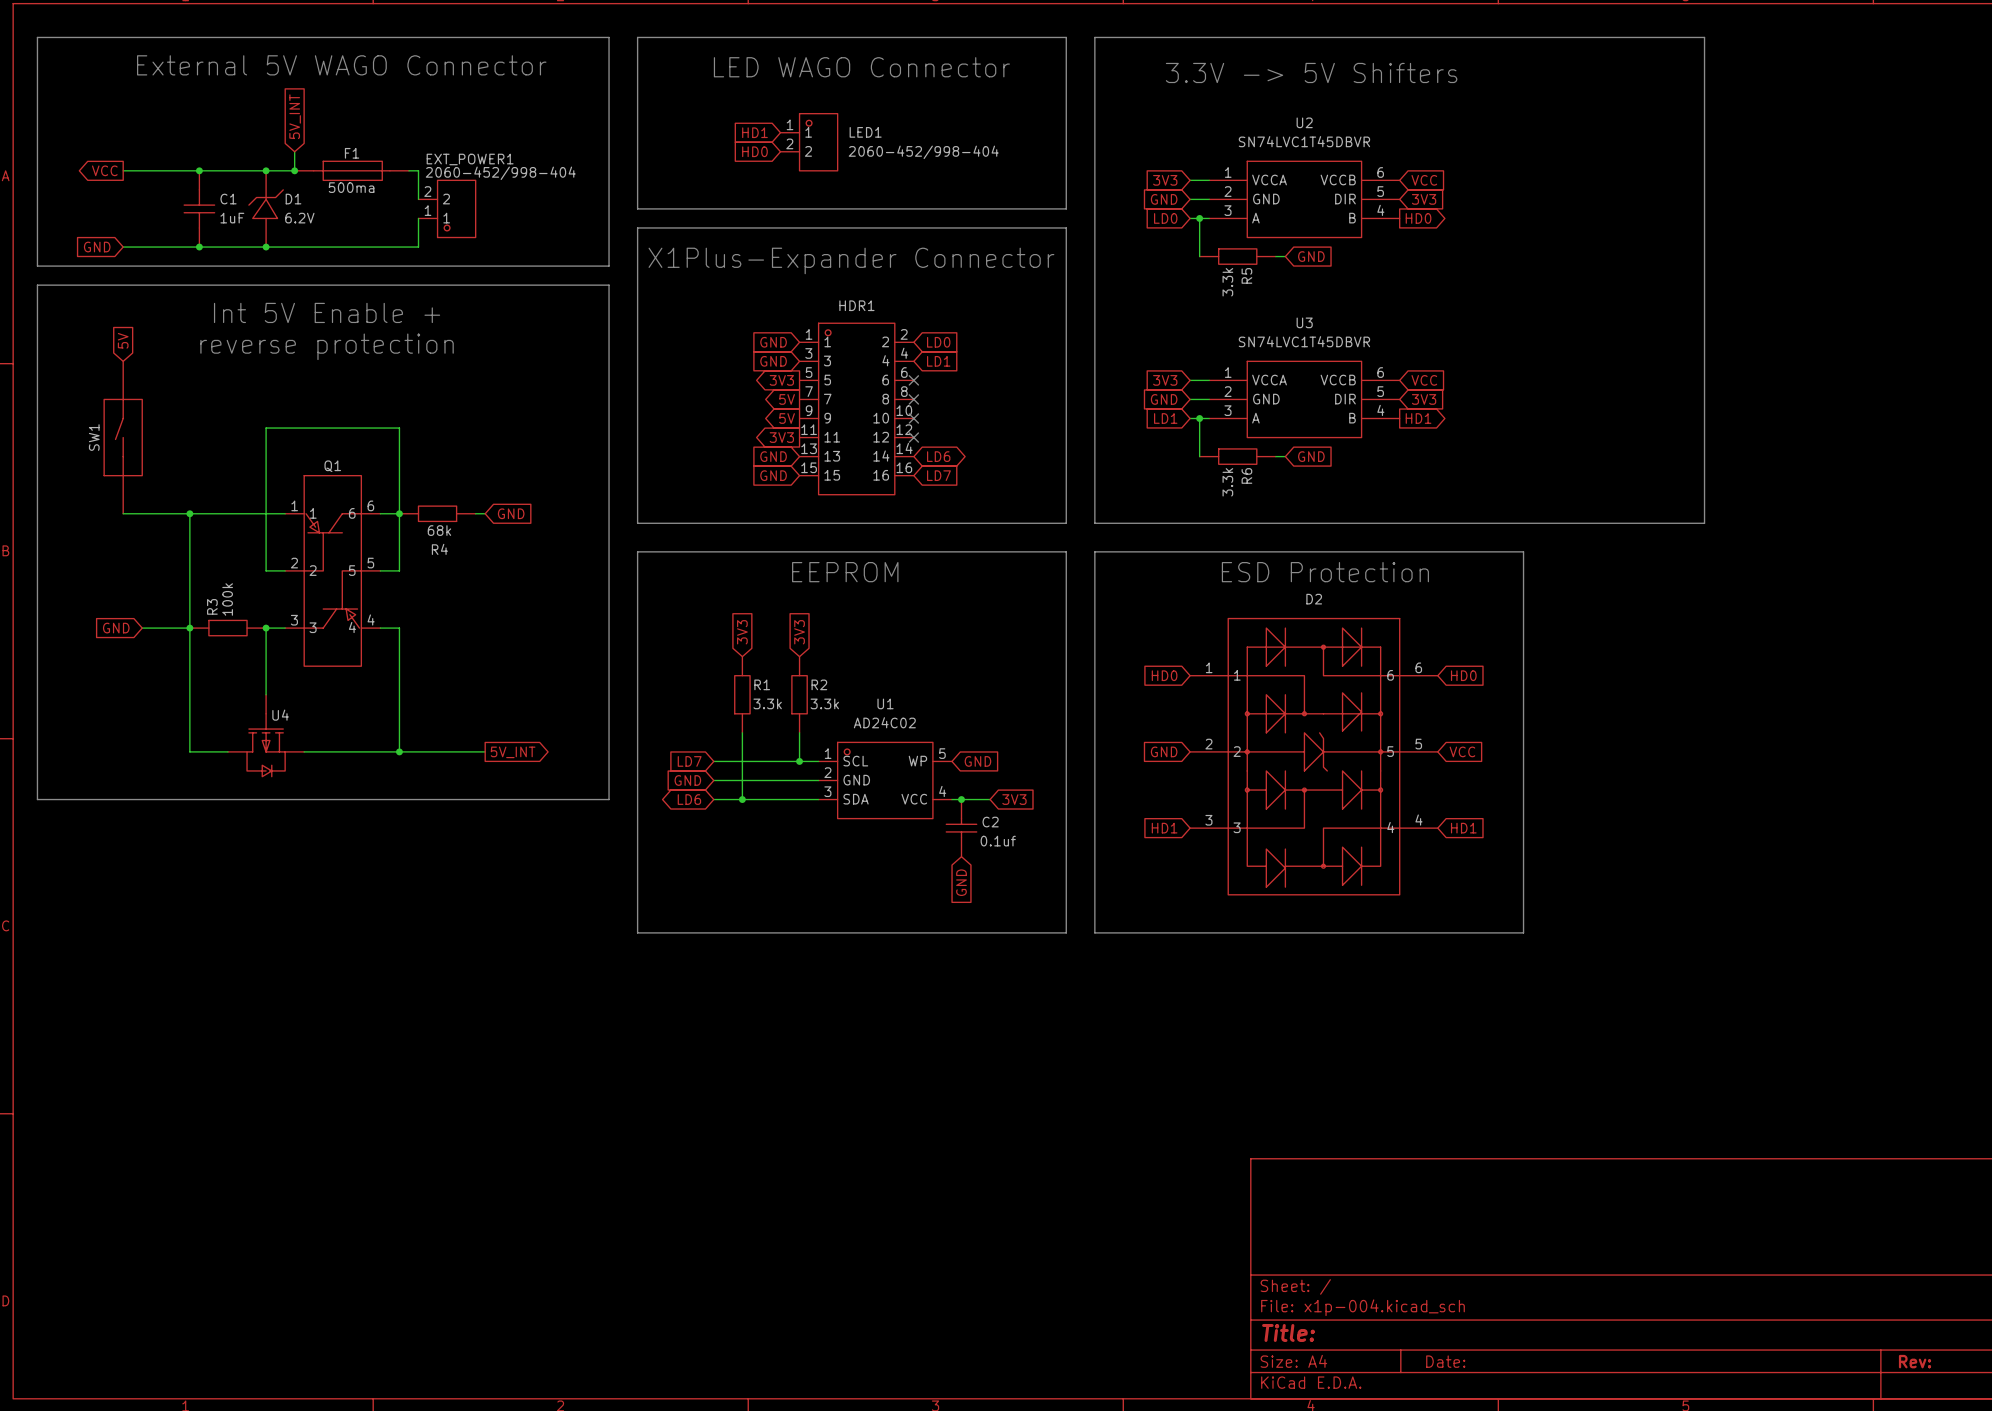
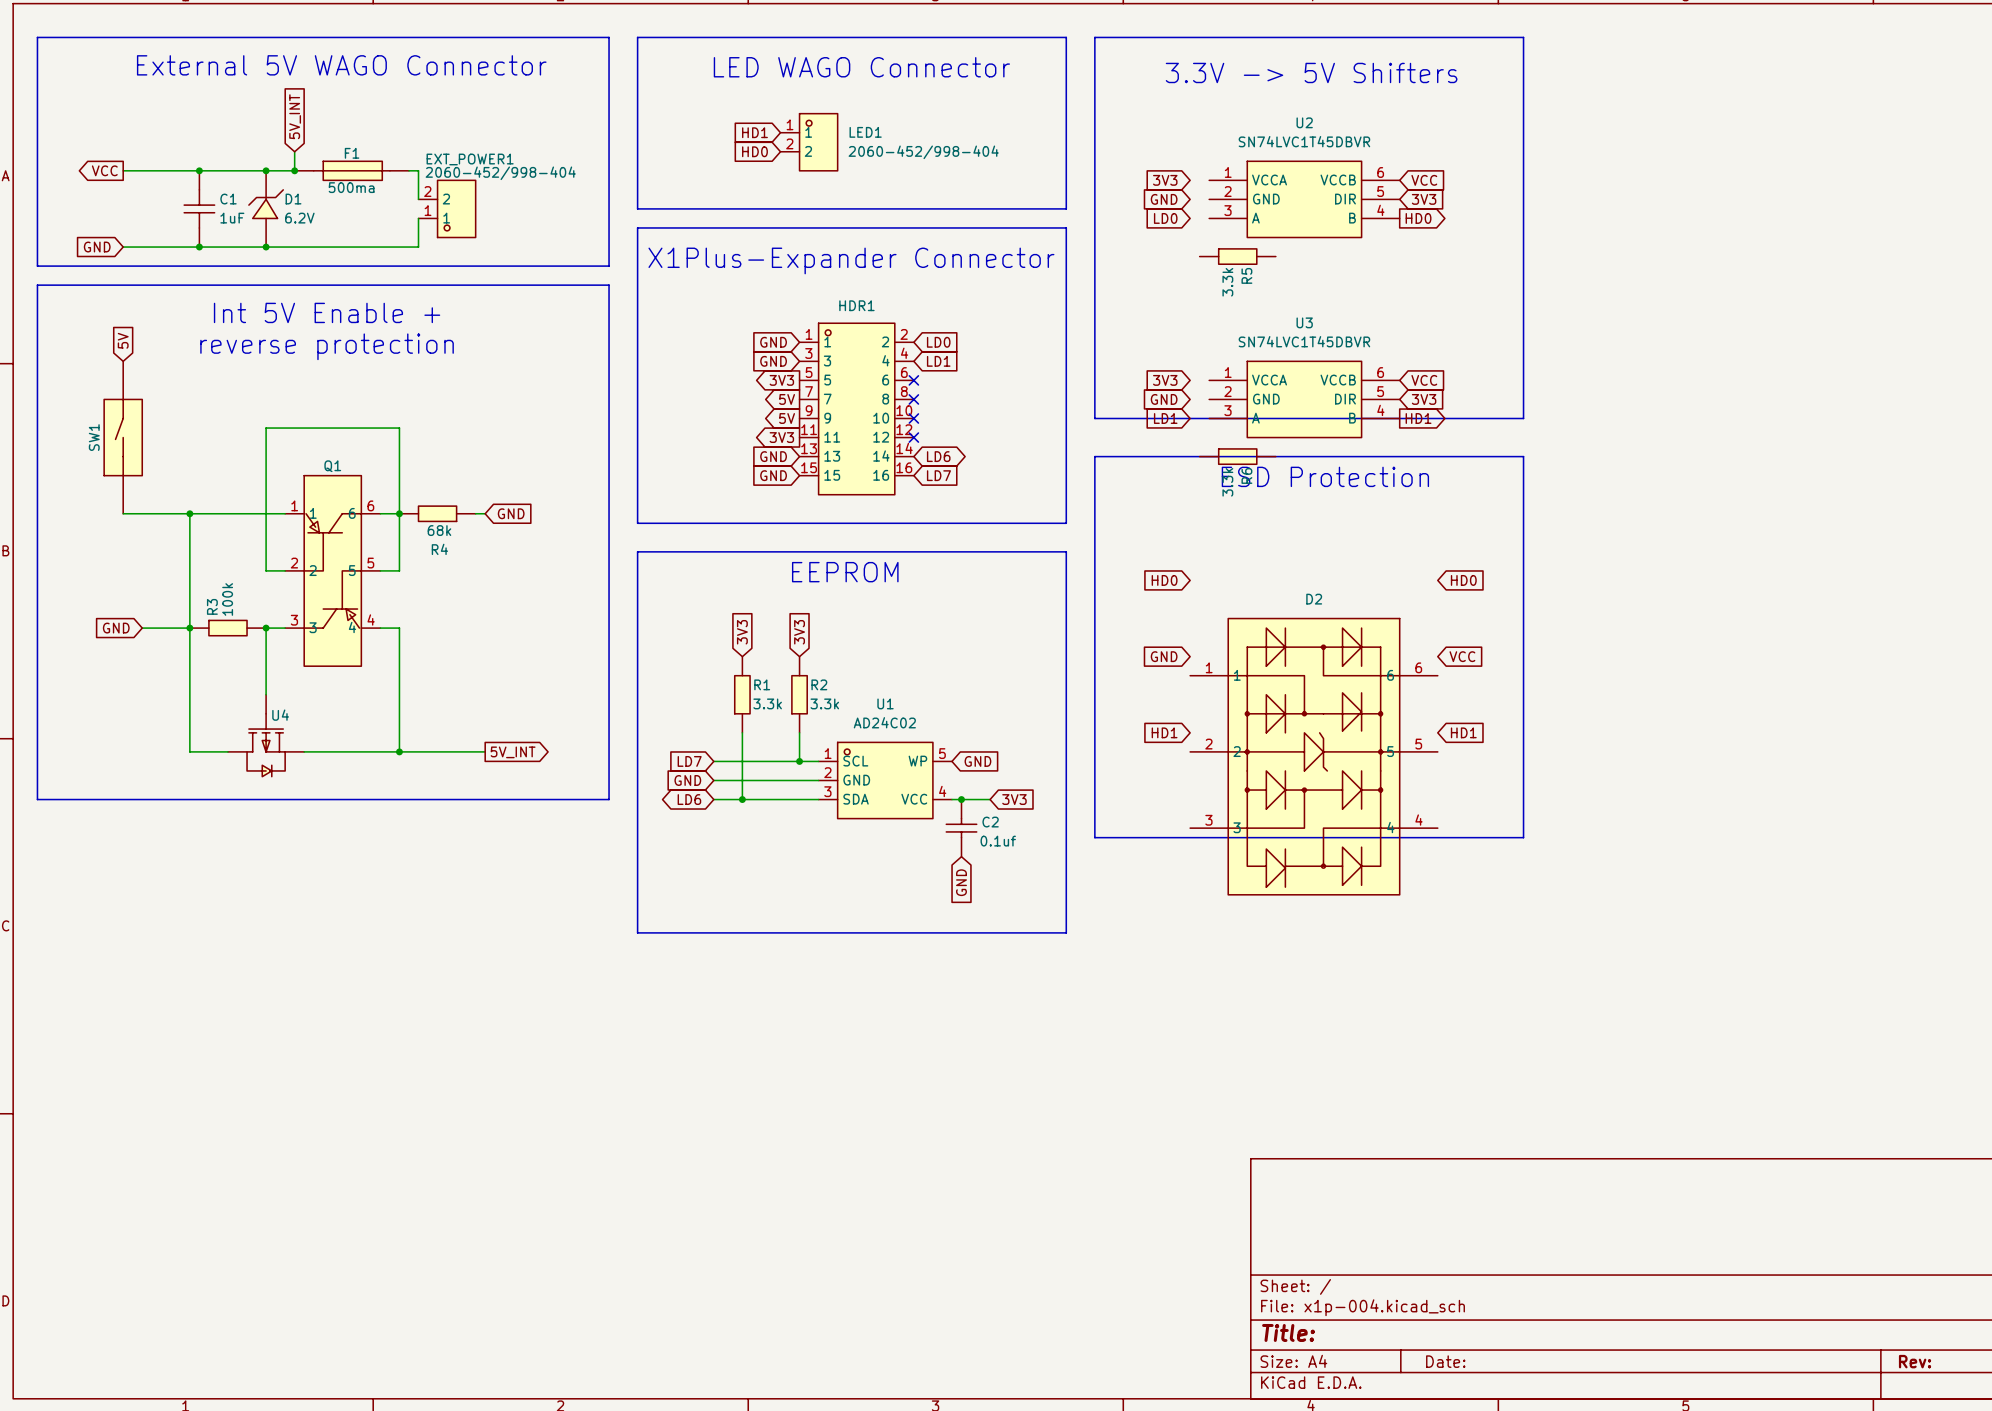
line: (1523, 37) (1704, 37) (1704, 523) (1094, 523) -> (1523, 37) (1523, 418) (1094, 418)
wire: (1190, 180) (1209, 180) -> none
wire: (1190, 199) (1209, 199) -> none
wire: (1190, 218) (1209, 218) -> none
wire: (1199, 218) (1199, 256) -> none
junction: (1199, 218) -> none
wire: (1275, 256) (1285, 256) -> none
global label: GND (1311, 256) -> none
wire: (1190, 380) (1209, 380) -> none
wire: (1190, 399) (1209, 399) -> none
line: (1094, 418) (1094, 456) -> none
wire: (1199, 418) (1199, 456) -> none
junction: (1199, 418) -> none
global label: GND (1311, 456) -> none
line: none -> (1094, 523) (1094, 551)
line: (1094, 551) (1523, 551) -> (1094, 456) (1523, 456) (1523, 551)
text position: ESD Protection (1325, 572) -> ESD Protection (1325, 476)
global label position: HD0 (1164, 675) -> HD0 (1164, 580)
global label position: HD0 (1463, 675) -> HD0 (1463, 580)
global label position: GND (1164, 751) -> GND (1164, 656)
global label position: VCC (1462, 751) -> VCC (1462, 656)
global label position: HD1 (1164, 828) -> HD1 (1164, 732)
global label position: HD1 (1463, 828) -> HD1 (1463, 732)
line: (1094, 837) (1094, 932) (1523, 932) (1523, 837) -> (1094, 837) (1523, 837)

